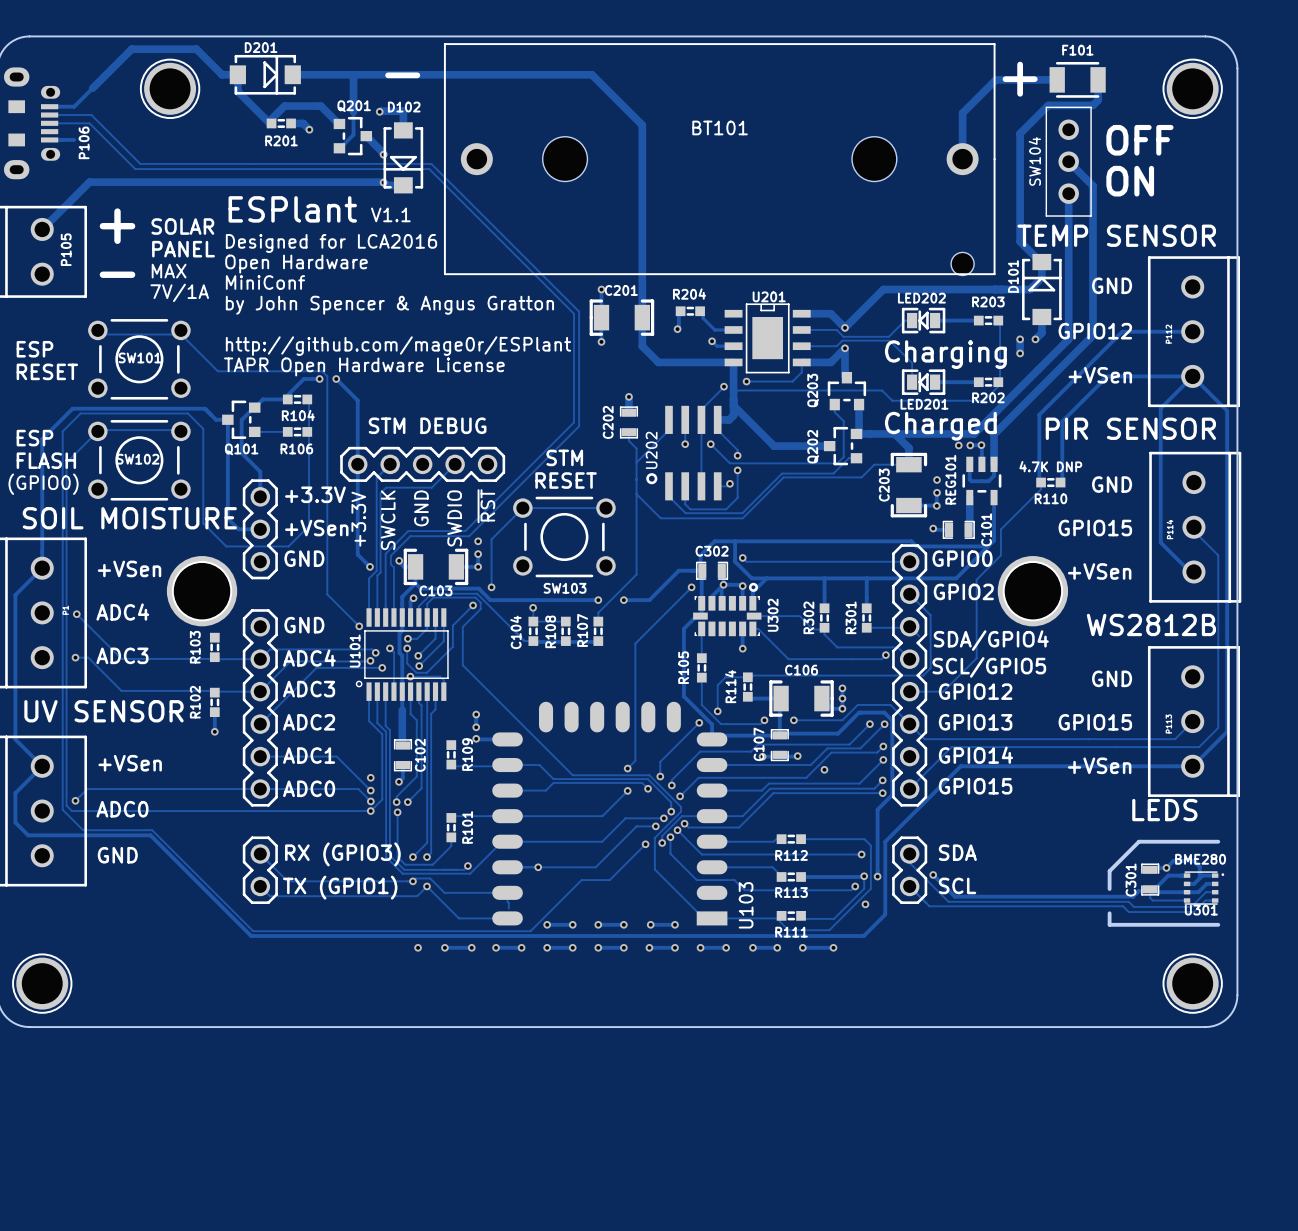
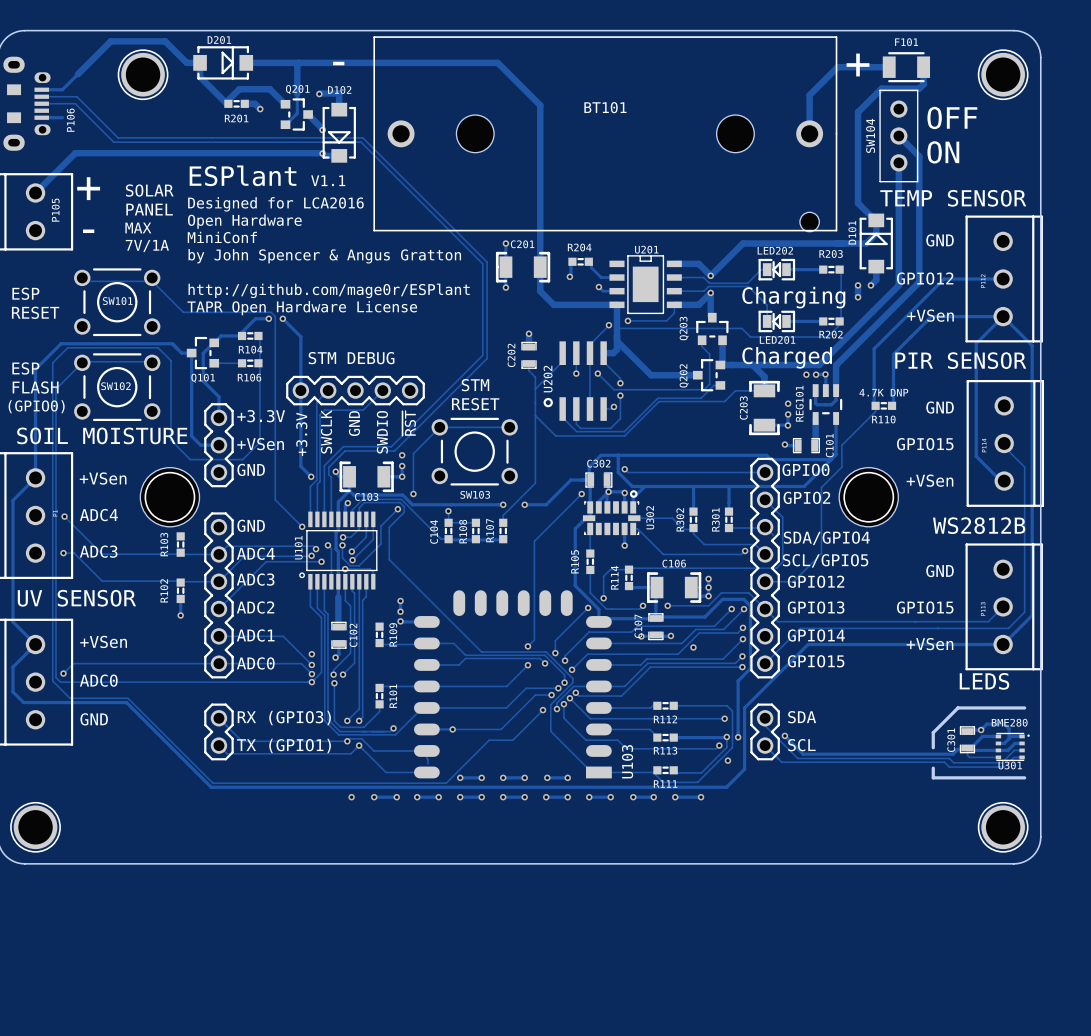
part footprint: [166, 556, 238, 627] -> [140, 467, 200, 527]
part footprint: [997, 556, 1069, 627] -> [839, 467, 899, 527]

